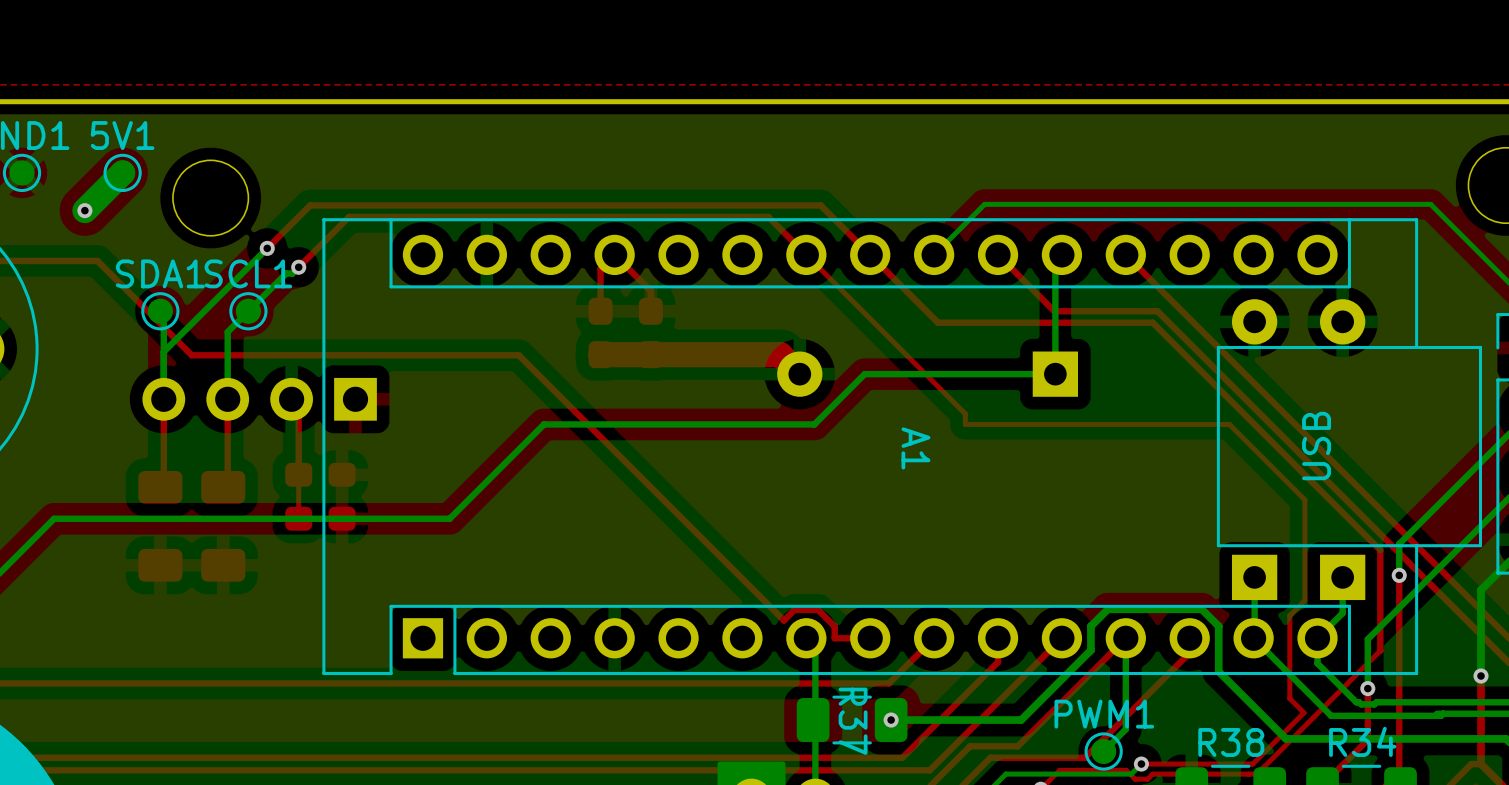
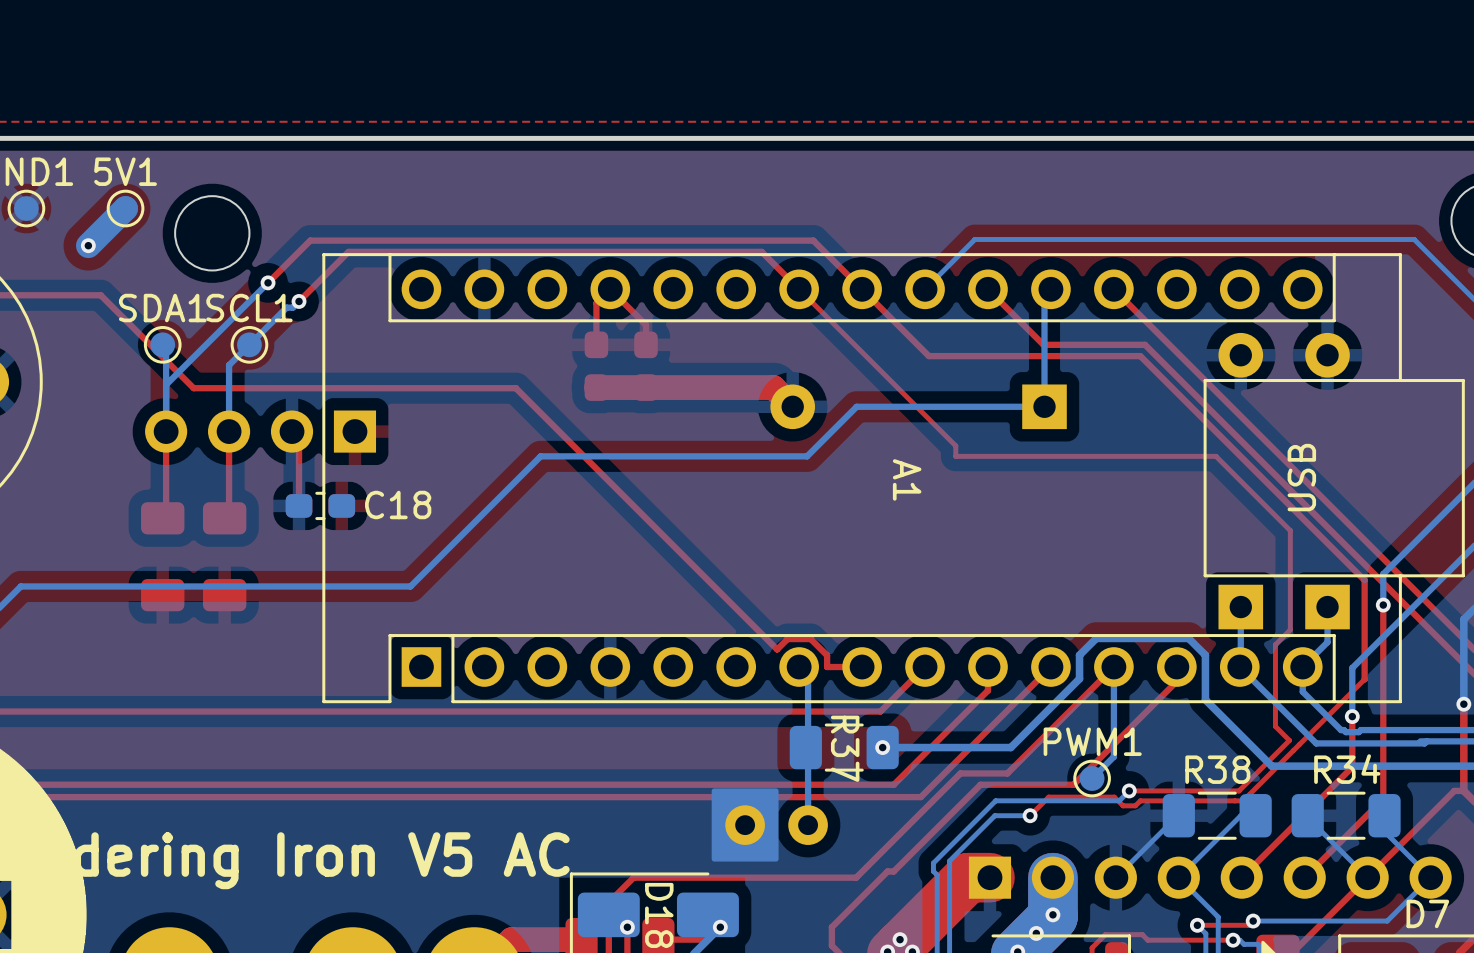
top track: (298, 474) (298, 518) -> none
C18 side: top (320, 518) -> bottom (320, 505)
bottom track: (449, 518) (54, 518) (16, 556) -> (447, 549) (410, 586) (20, 586)

